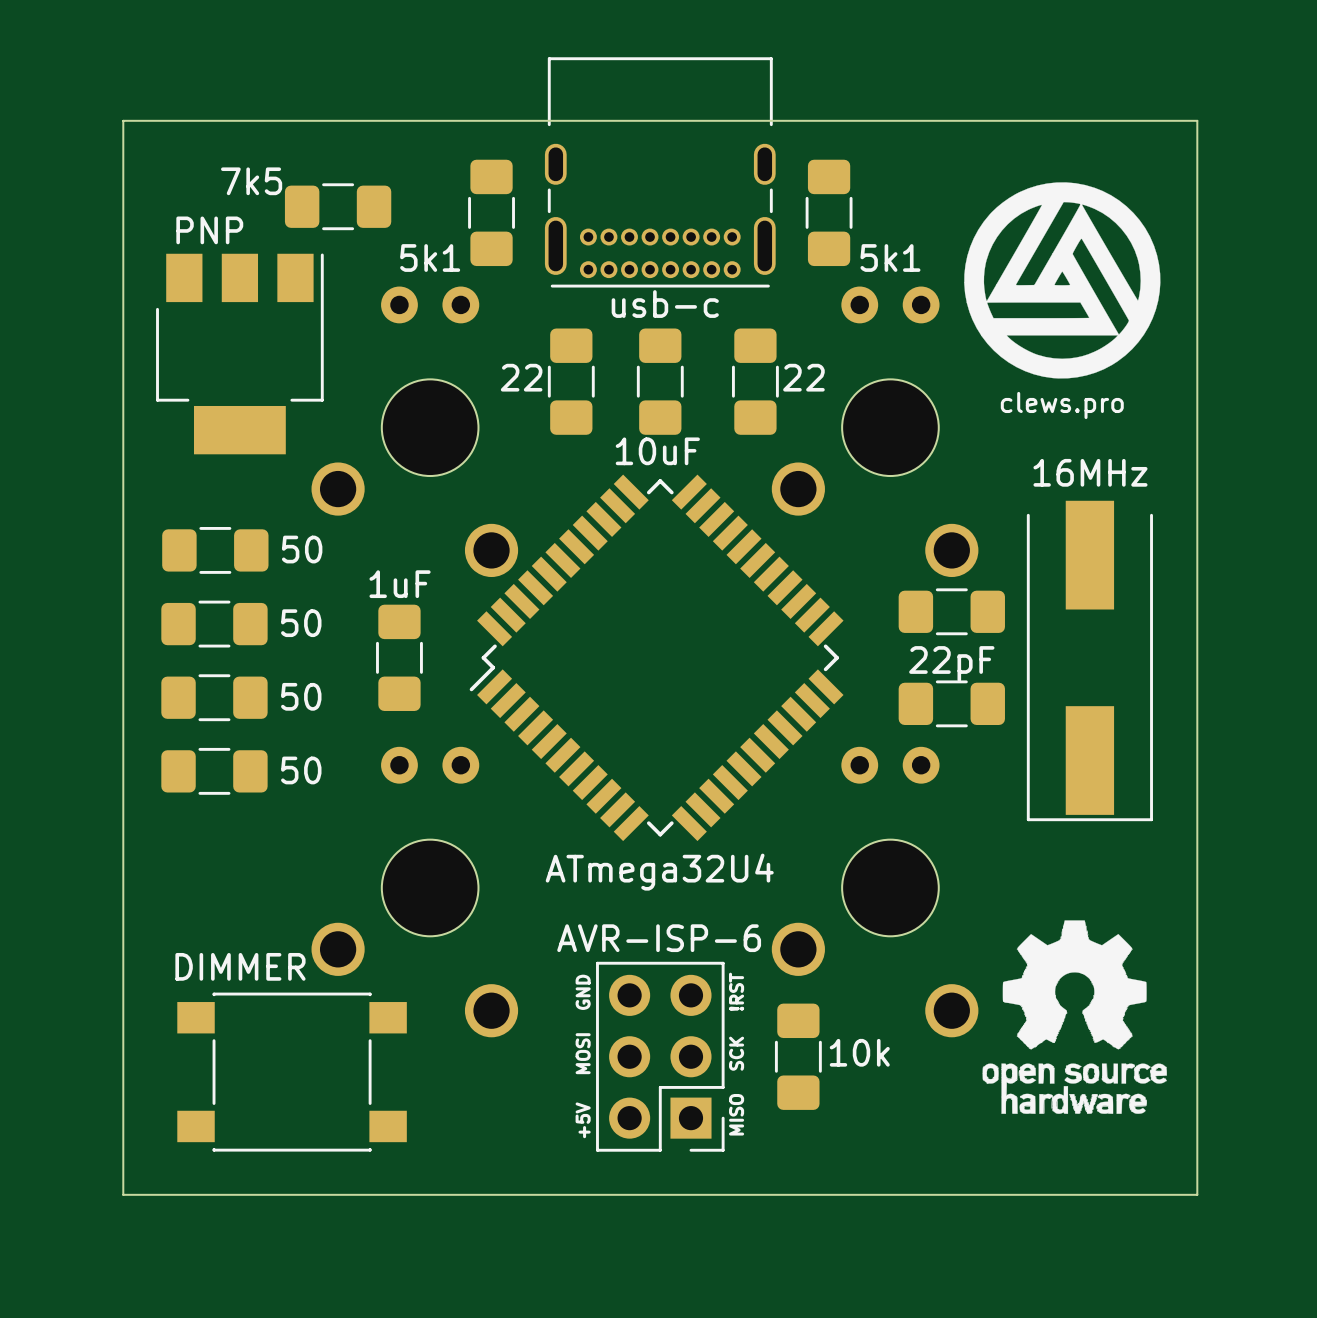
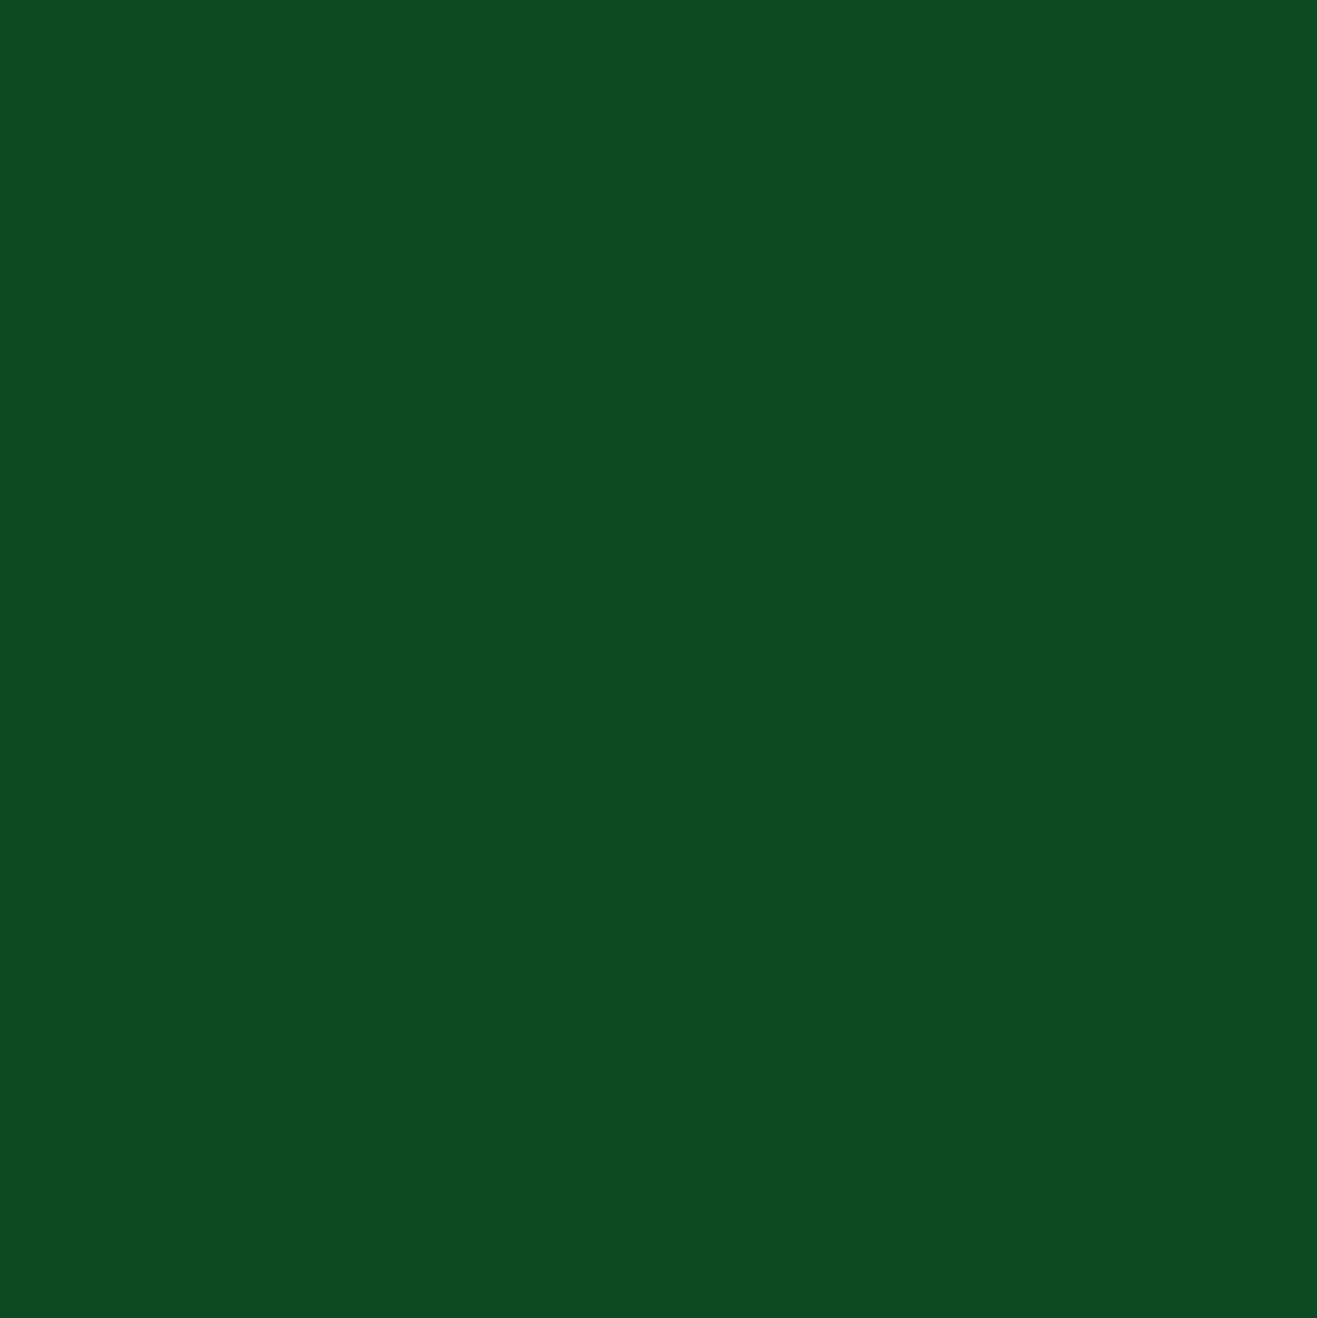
board edge: (1197, 120) (1197, 1194) (123, 1194) (123, 120) (1197, 120) -> none
part: usb-c (660, 172) -> none
drawing: [964, 182, 1161, 379] -> none
part: 7k5 (338, 206) -> none
part: 5k1 (491, 212) -> none
part: 5k1 (829, 212) -> none
part: PNP (239, 353) -> none
part: 22 (571, 381) -> none
part: 10uF (660, 381) -> none
part: 22 (755, 381) -> none
text: clews.pro (1062, 405) -> none
part: (414, 431) -> none
part: (875, 431) -> none
part: 50 (215, 550) -> none
part: 22pF (951, 611) -> none
part: 50 (214, 624) -> none
part: 1uF (399, 657) -> none
part: ATmega32U4 (656, 657) -> none
part: 16MHz (1089, 660) -> none
part: 50 (214, 697) -> none
part: (951, 703) -> none
part: 50 (214, 771) -> none
part: (414, 892) -> none
part: (875, 892) -> none
drawing: [982, 920, 1168, 1114] -> none
text: !RST (736, 991) -> none
text: GND (583, 992) -> none
text: MOSI (583, 1053) -> none
text: SCK (736, 1053) -> none
part: AVR-ISP-6 (660, 1056) -> none
part: 10k (798, 1056) -> none
part: DIMMER (292, 1072) -> none
text: MISO (736, 1114) -> none
text: +5V (583, 1120) -> none

